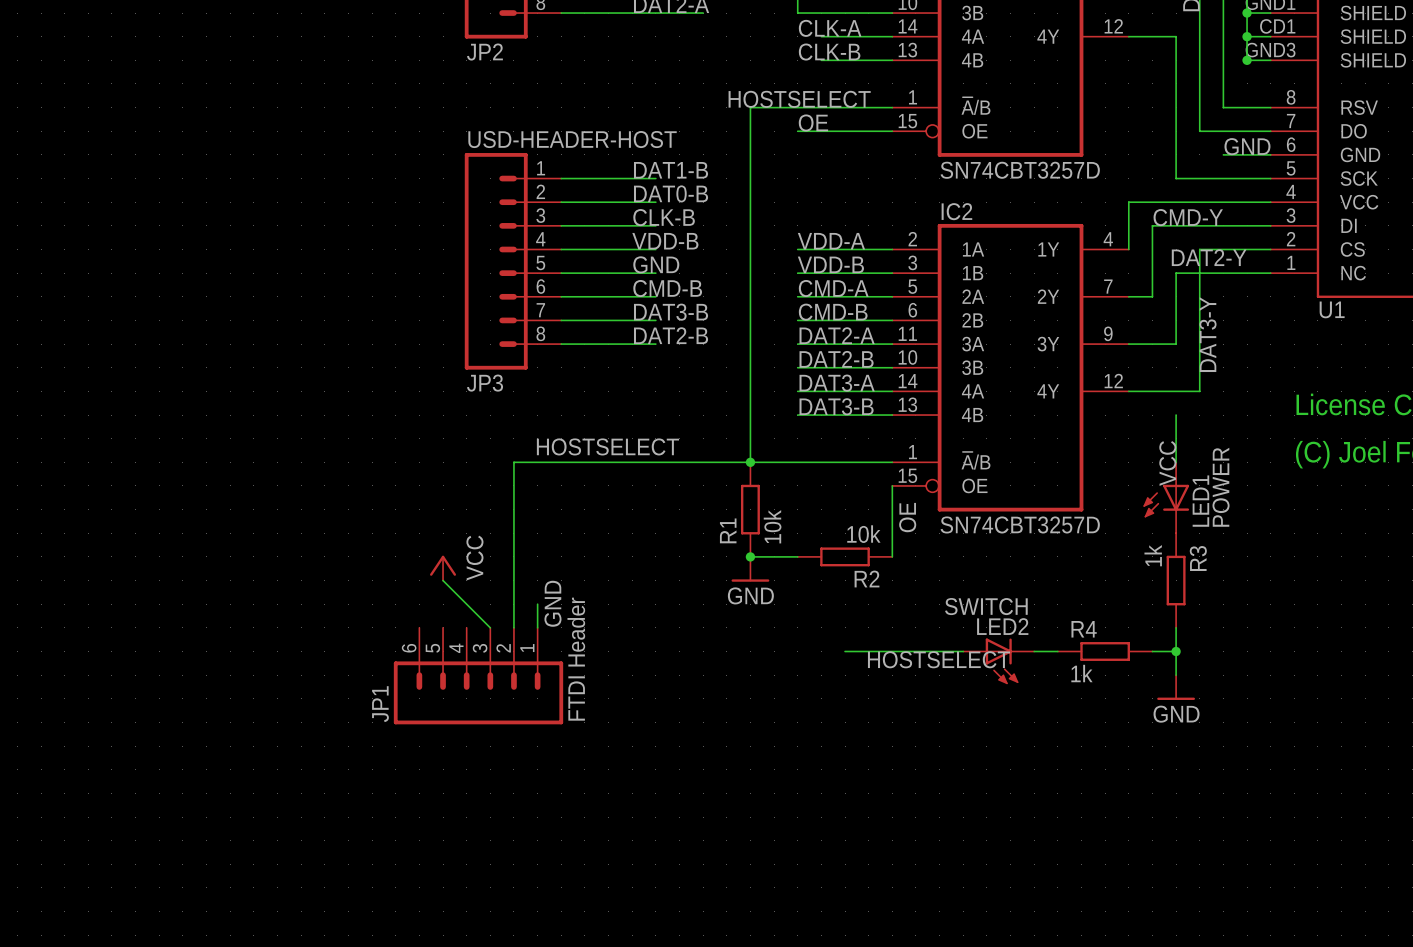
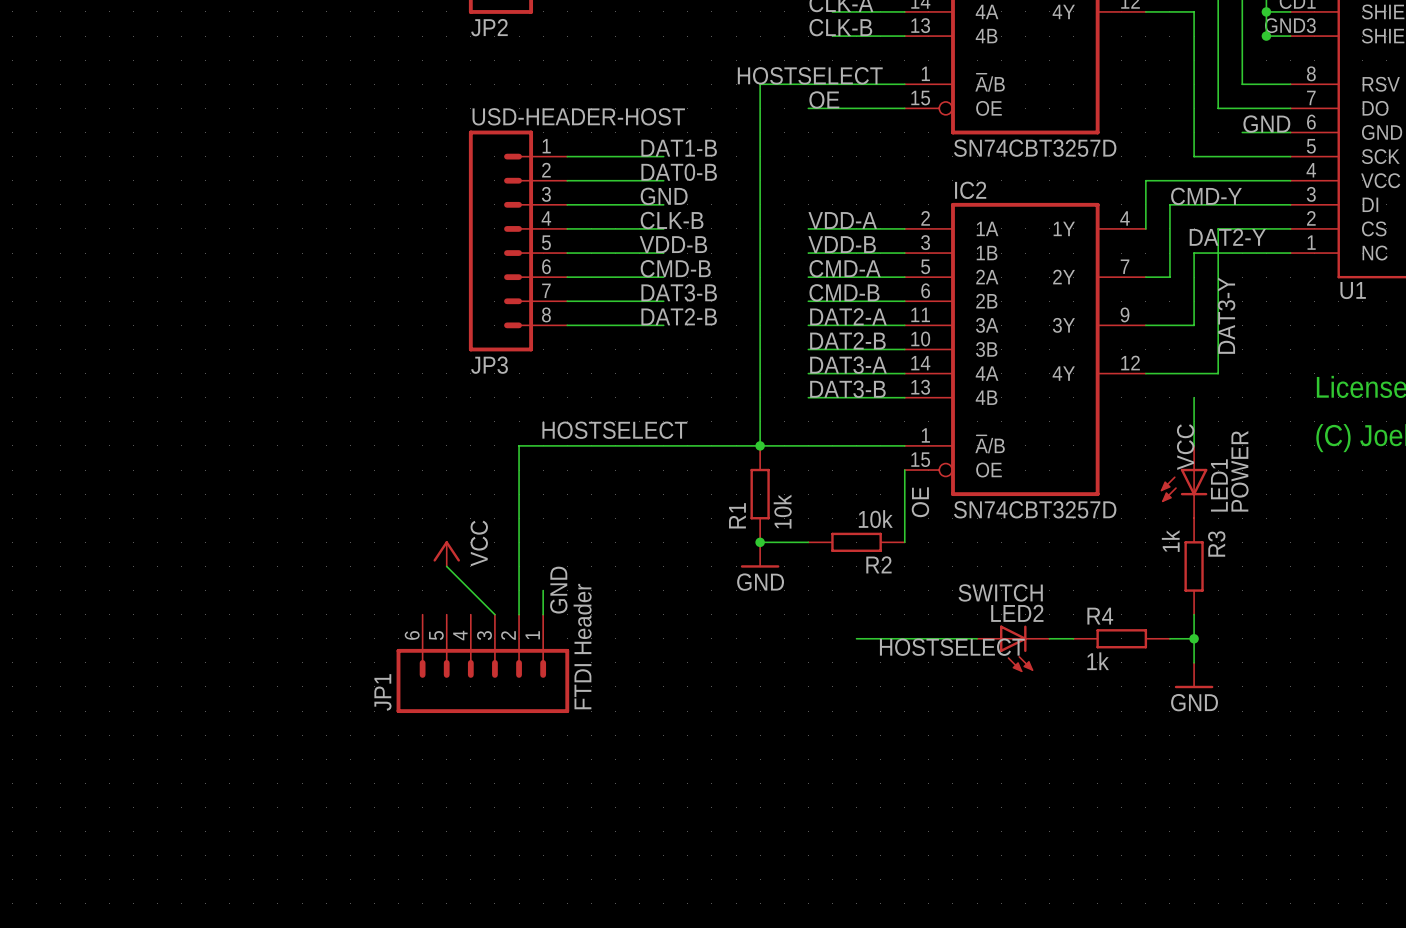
label: CLK-B (664, 217) -> GND (664, 196)
label: VDD-B (665, 241) -> CLK-B (672, 220)
label: GND (656, 264) -> VDD-B (673, 244)

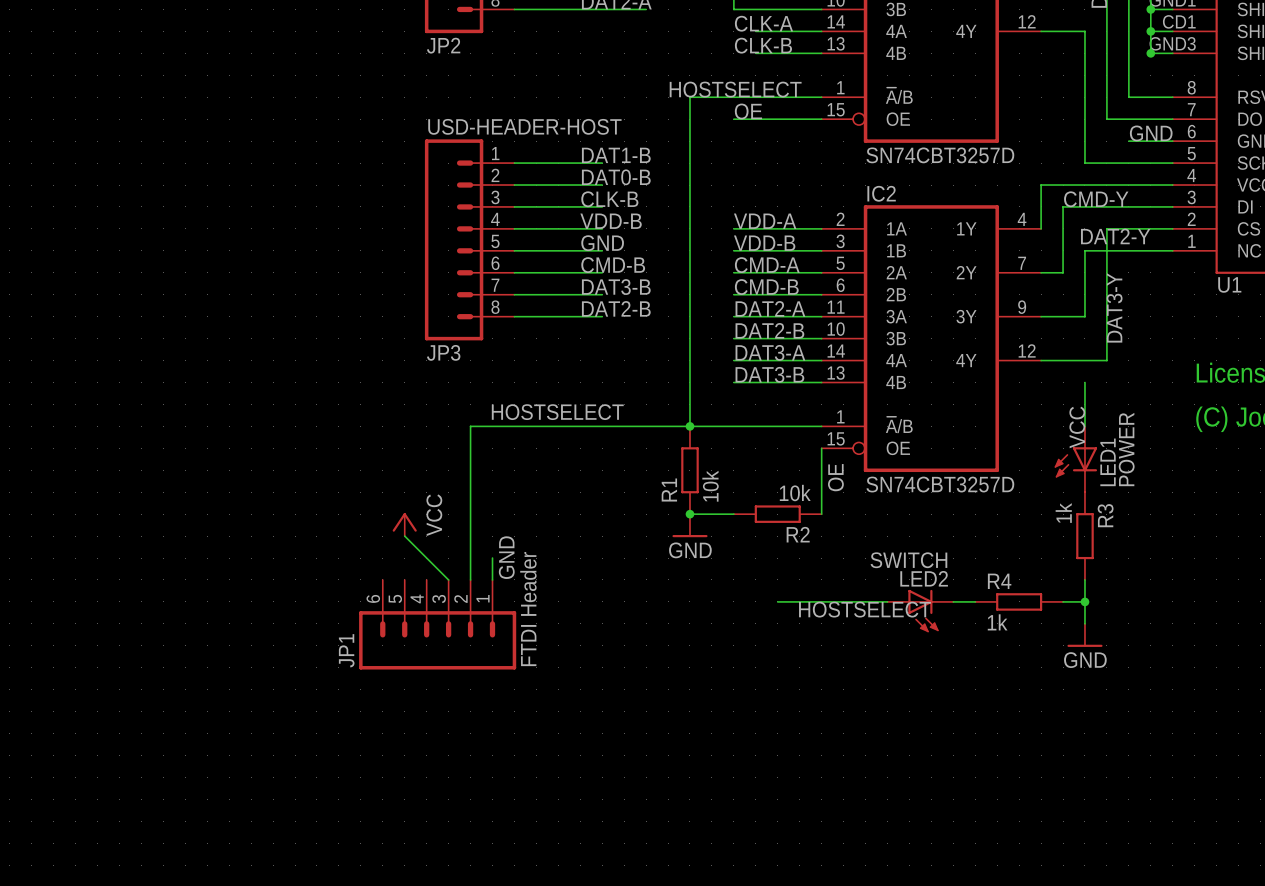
label: GND (664, 196) -> CLK-B (609, 199)
label: CLK-B (672, 220) -> VDD-B (611, 221)
label: VDD-B (673, 244) -> GND (602, 243)

